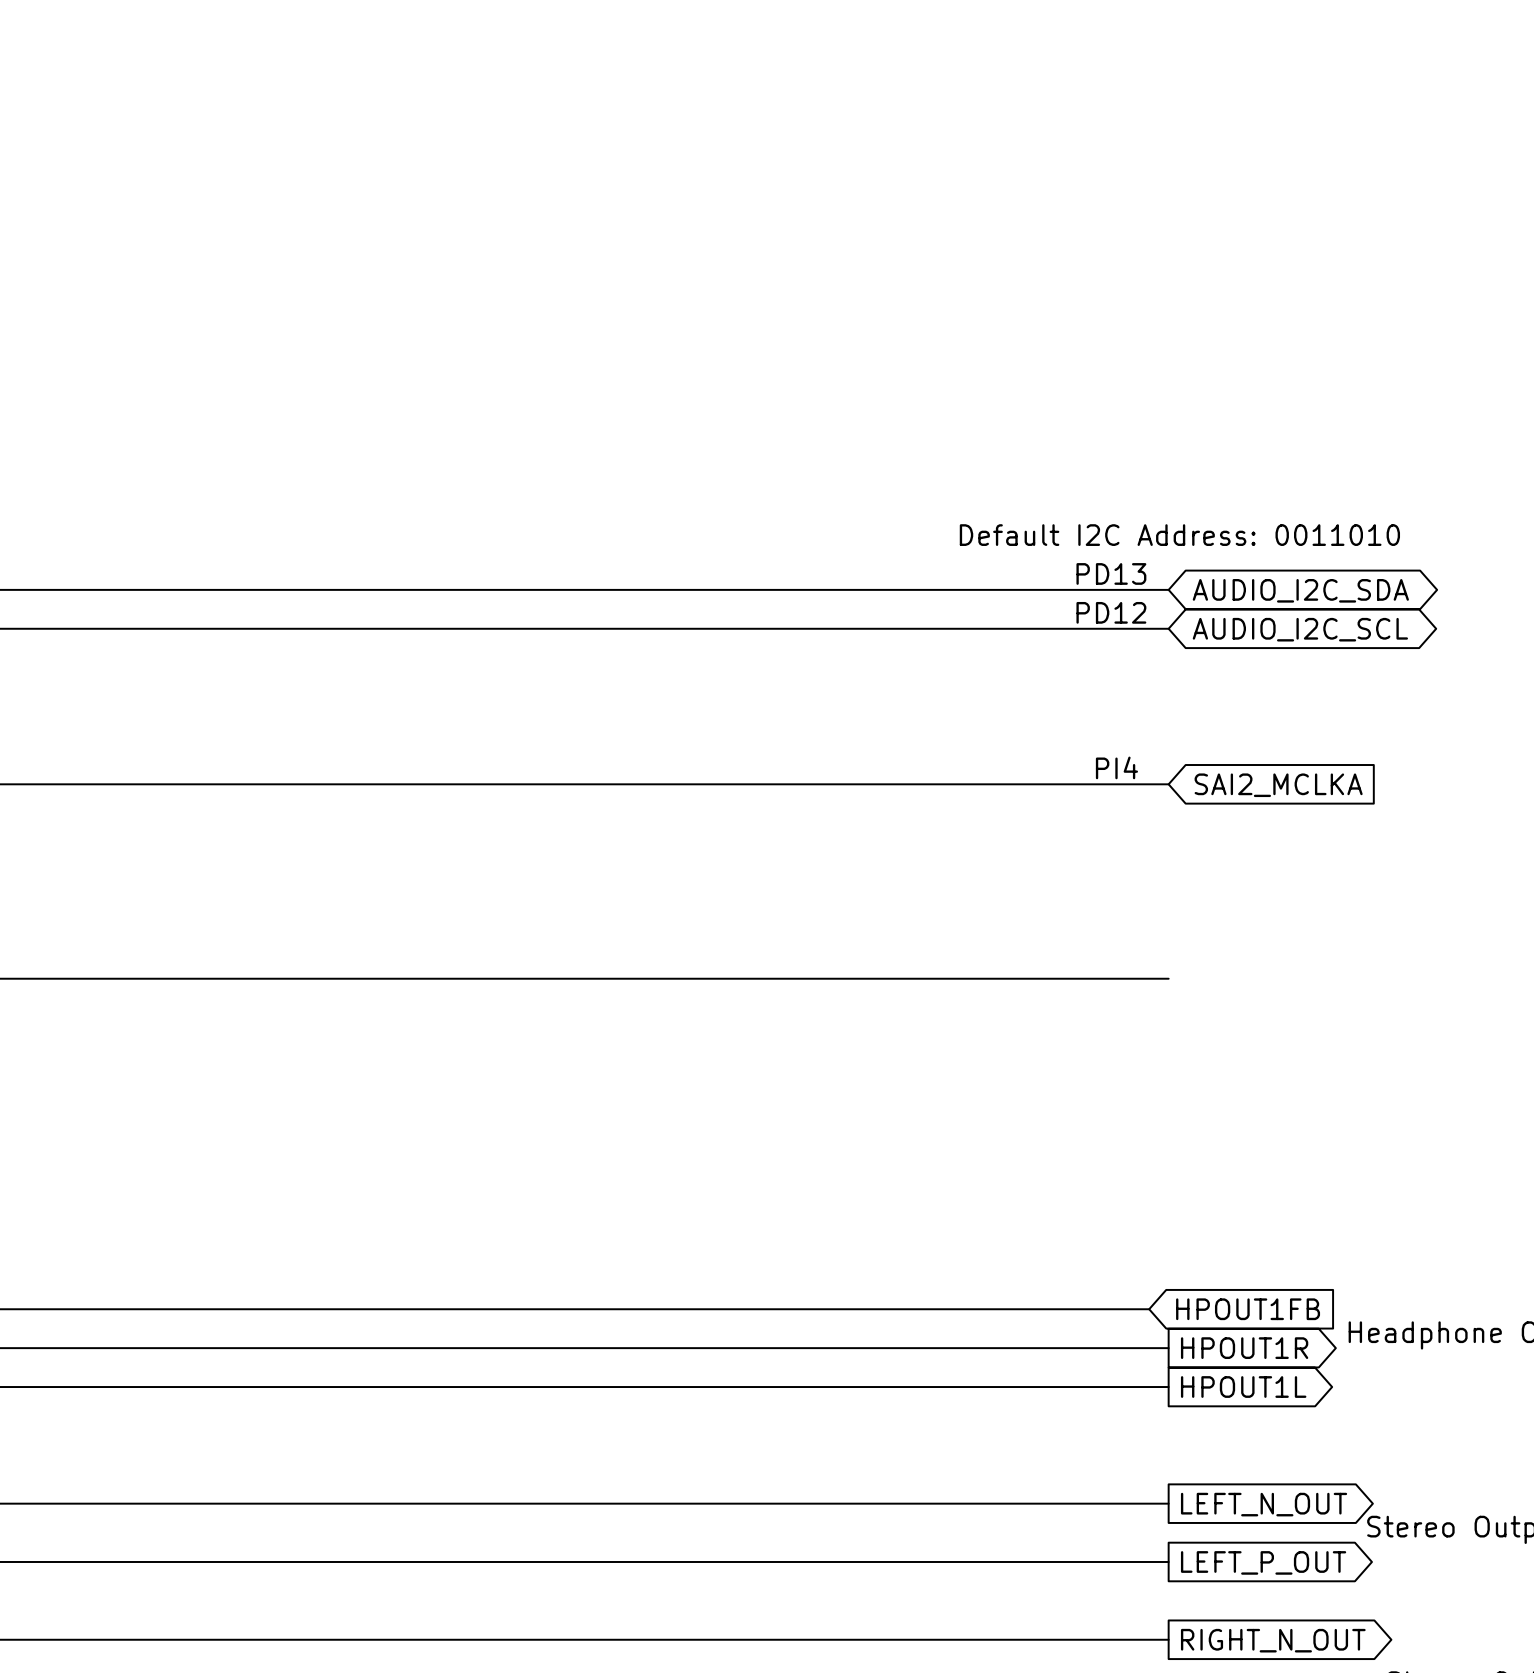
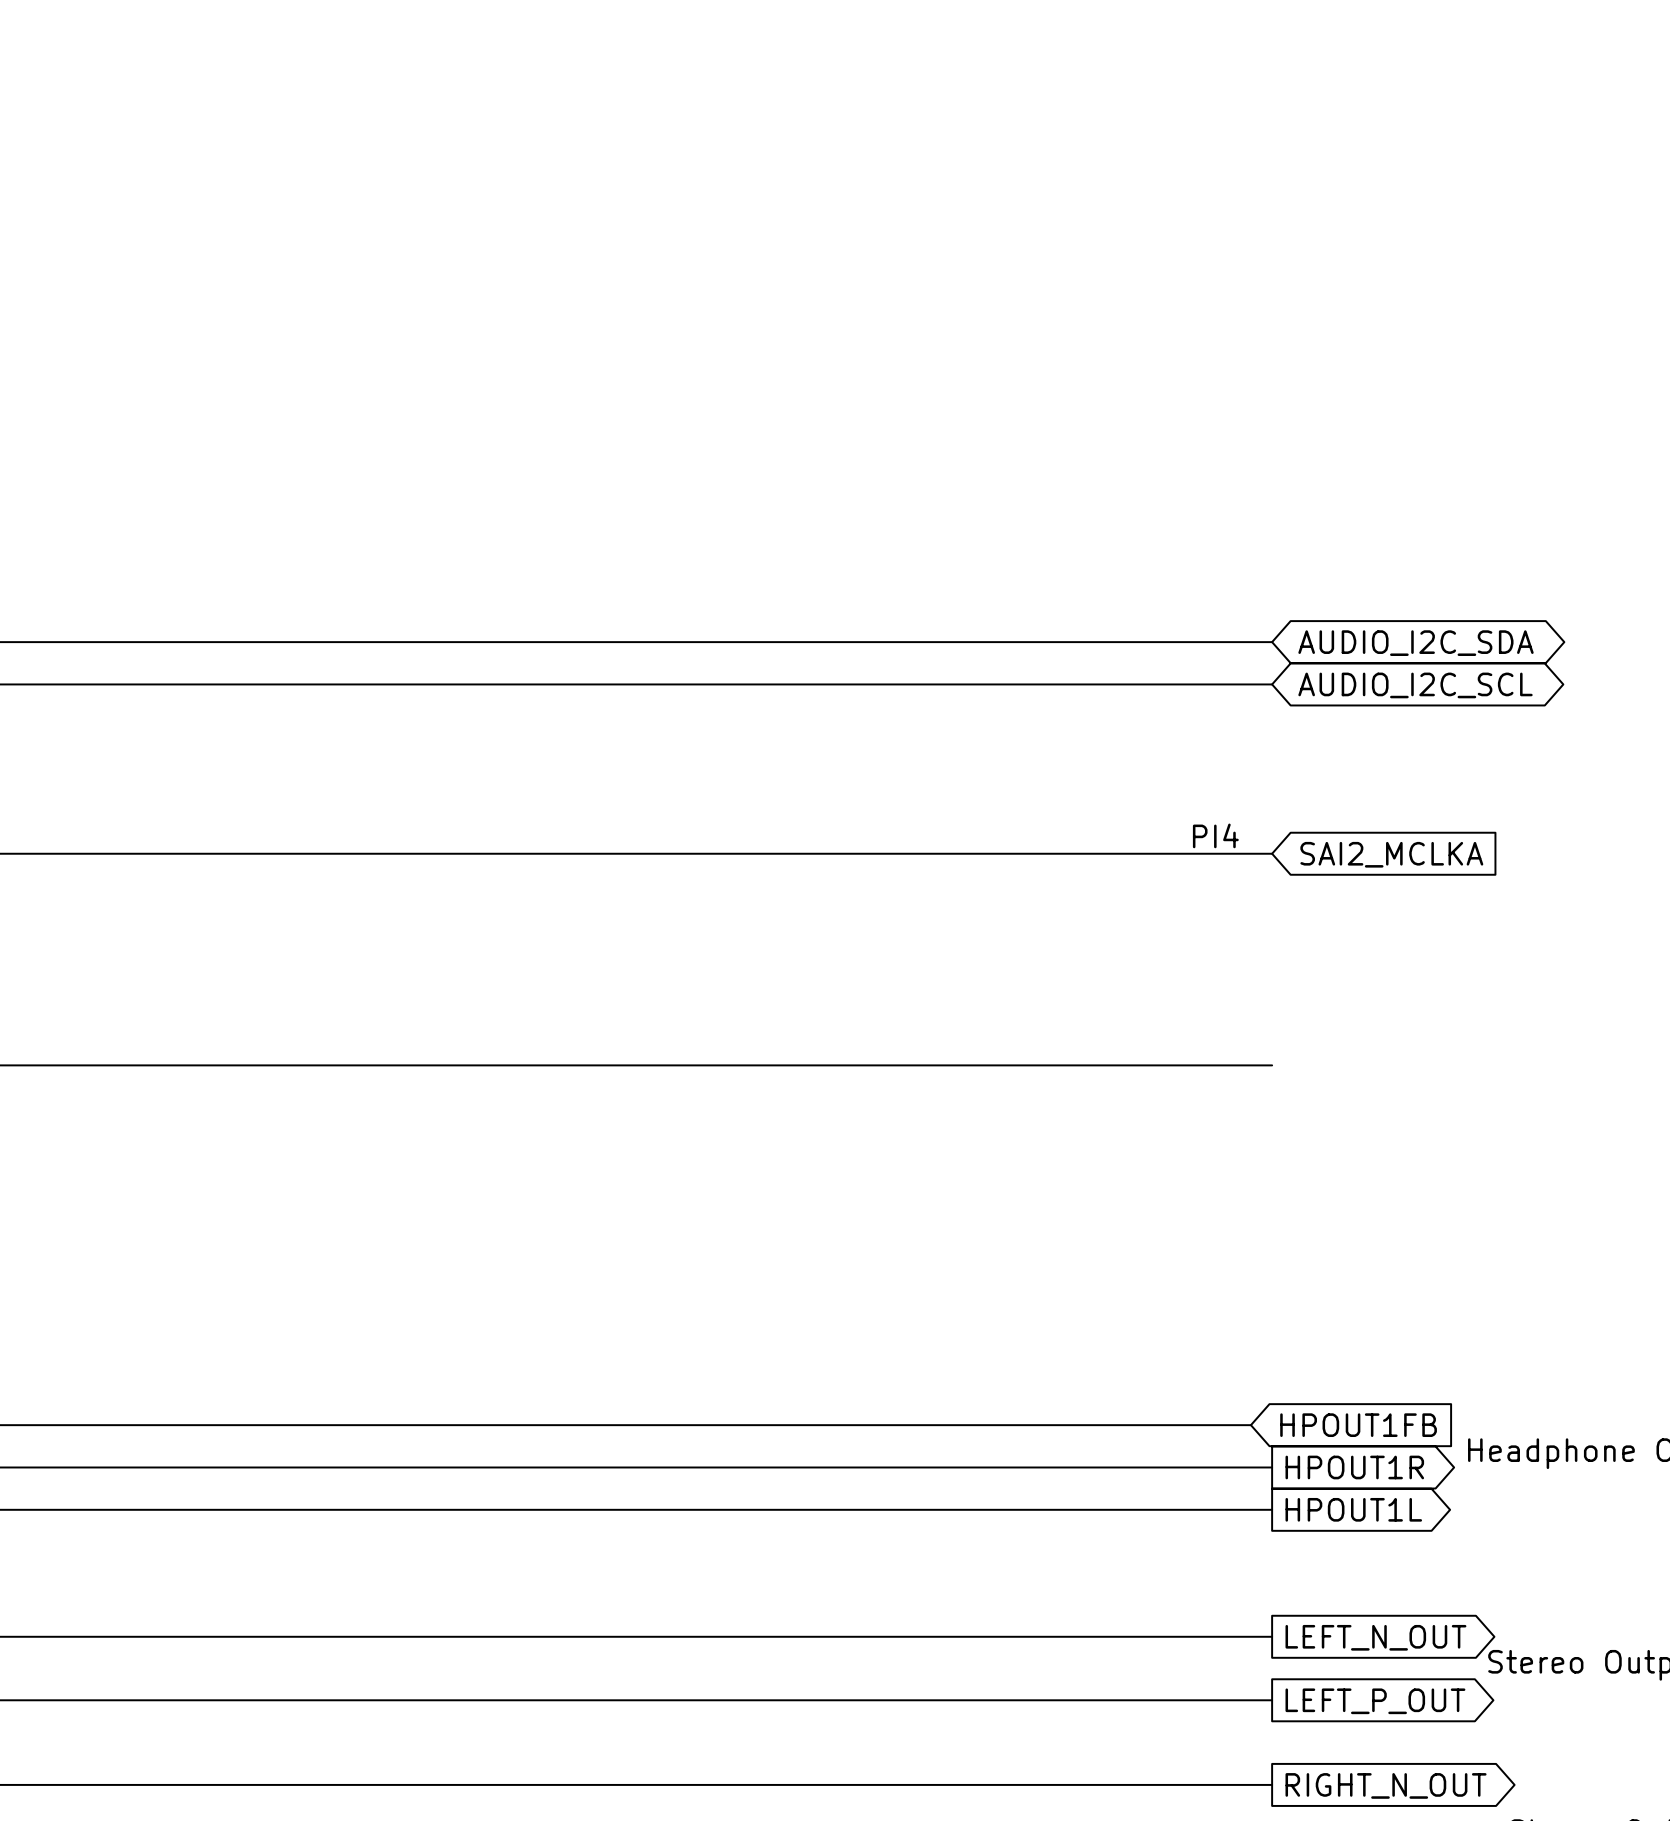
text: Default I2C Address: 0011010 (1179, 535) -> none
text: PD13 (1111, 573) -> none
text: PD12 (1111, 612) -> none

